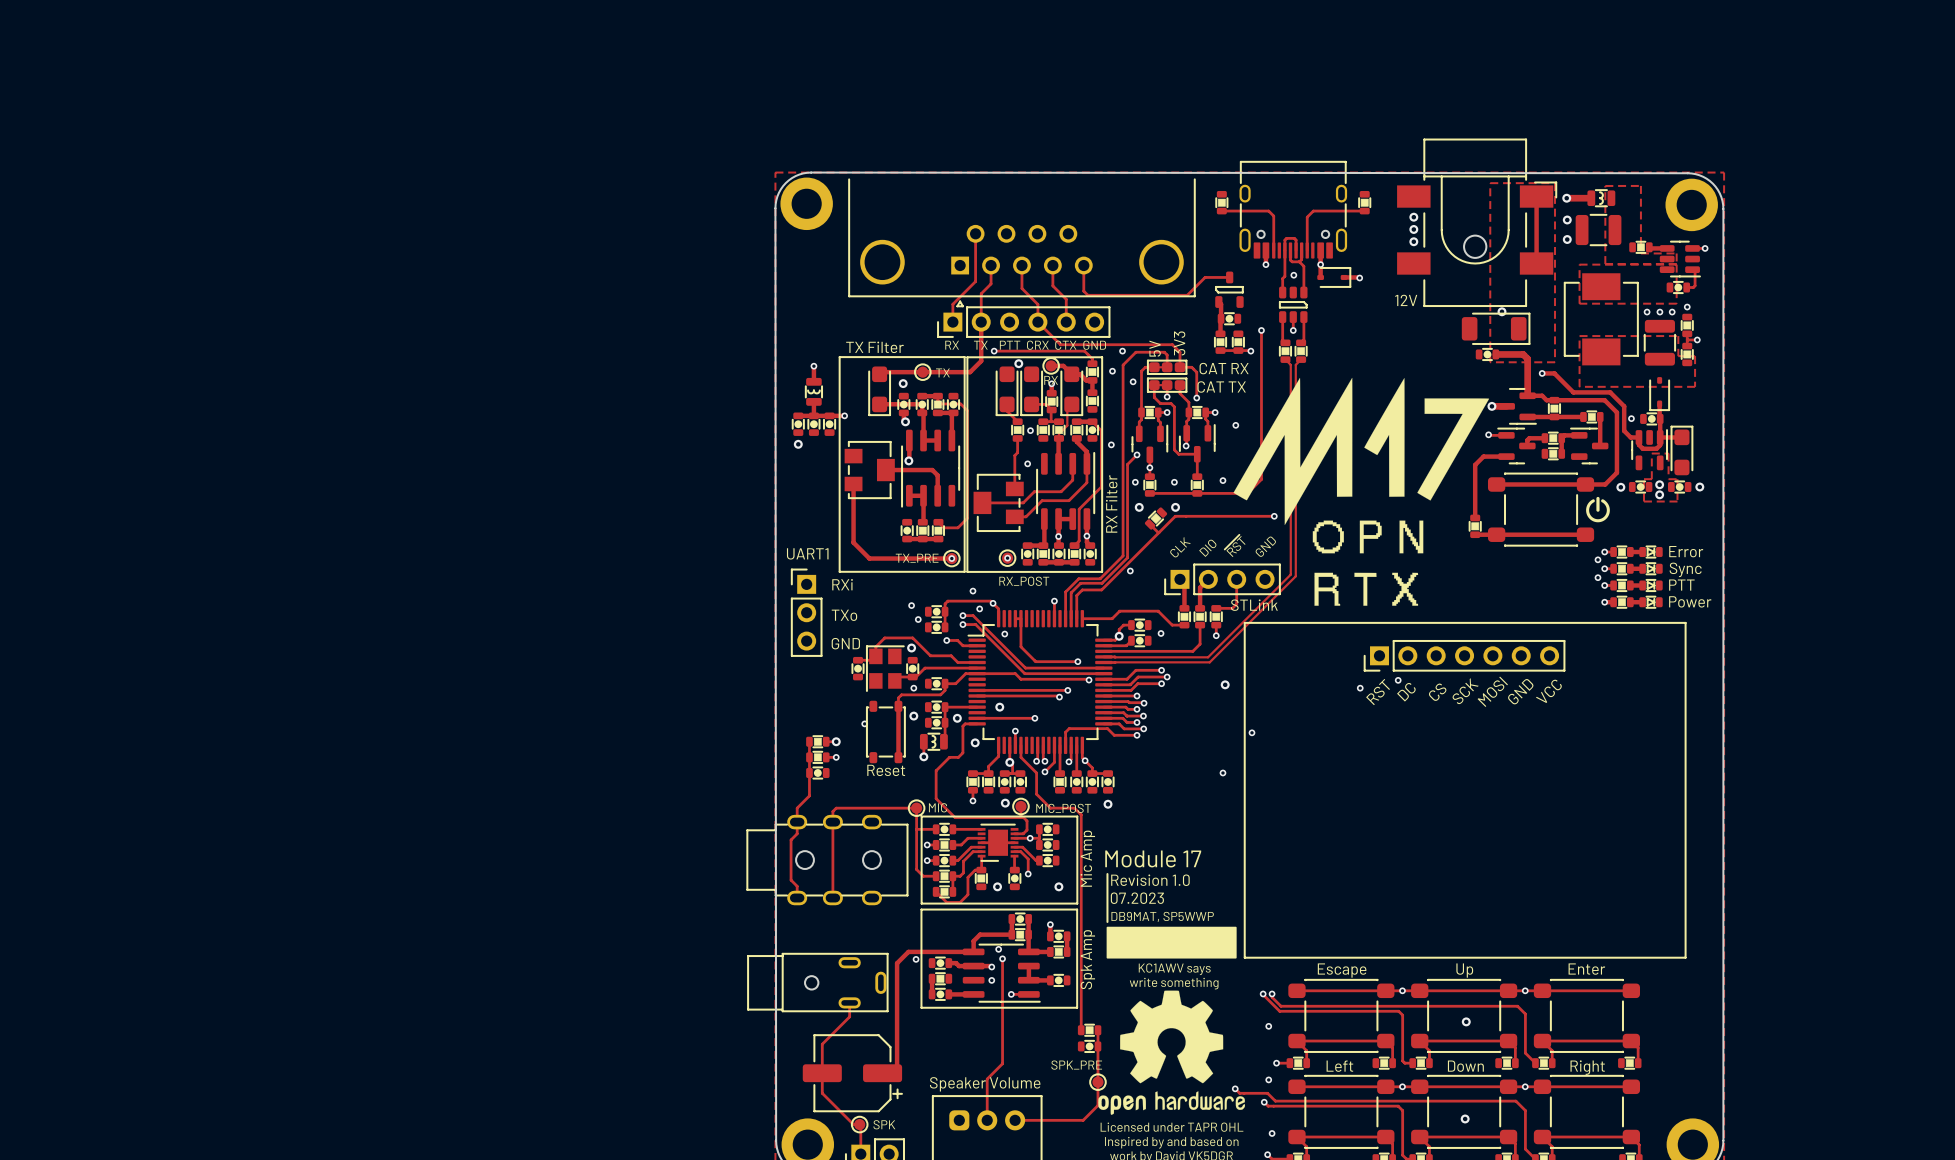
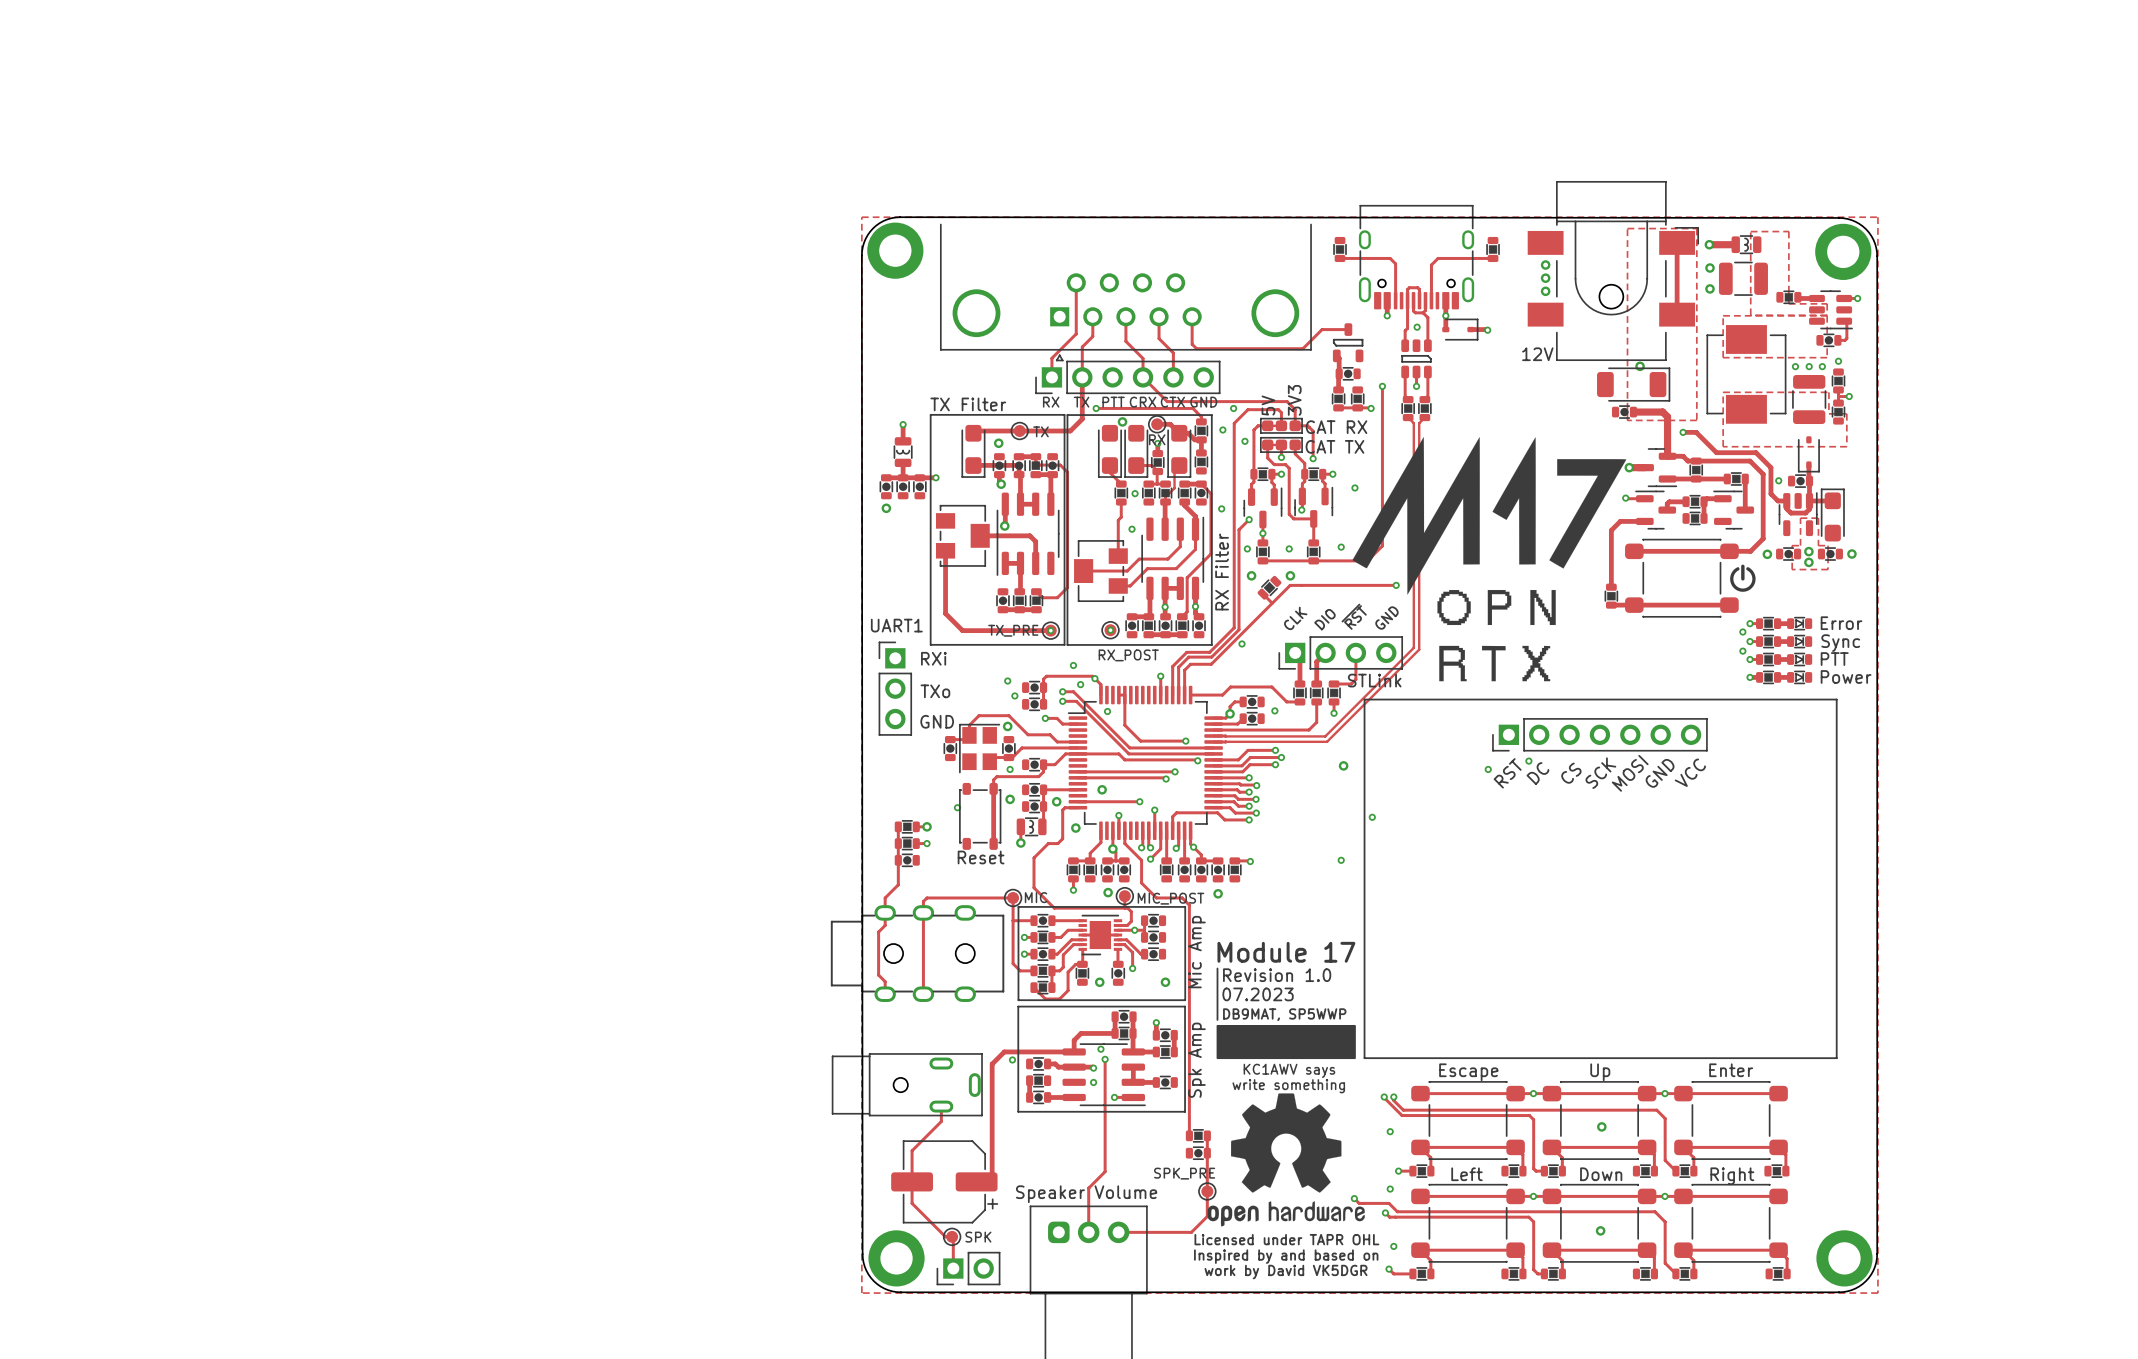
track: none -> (1154, 810) (1154, 830)
via: none -> (1154, 810)
track: none -> (1234, 860) (1250, 861)
via: none -> (1250, 861)
part: none -> (1234, 869)

